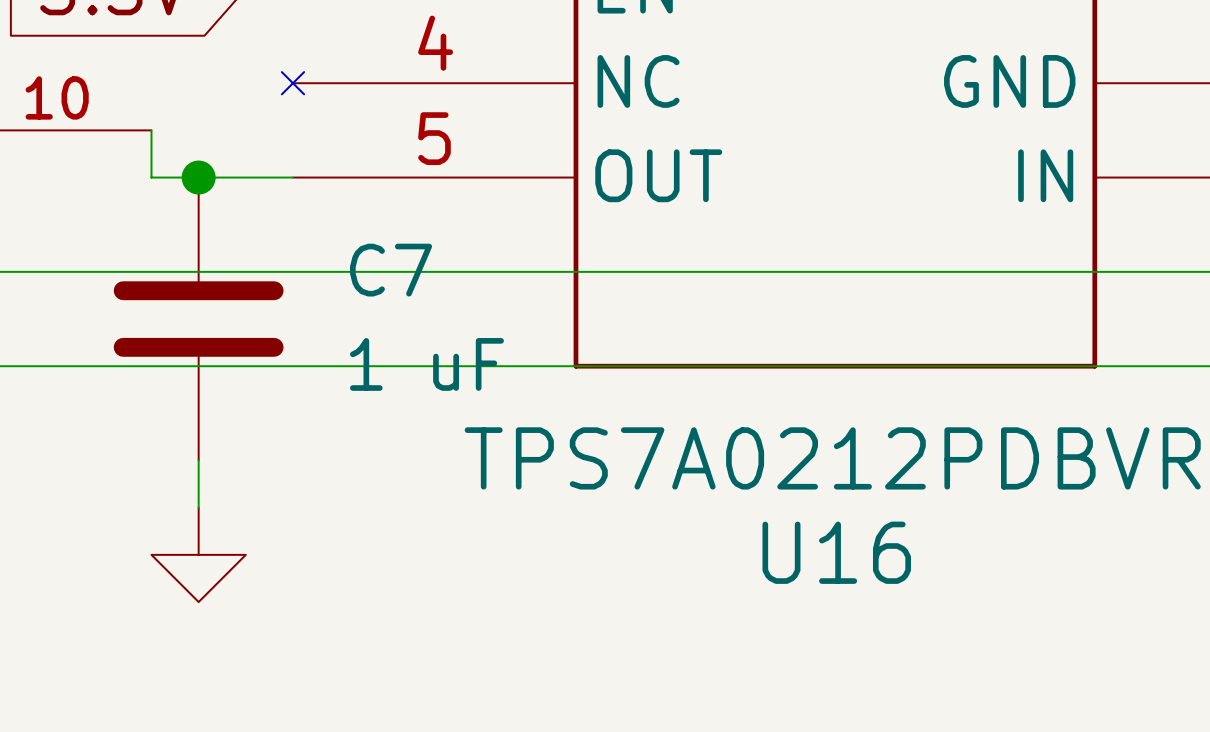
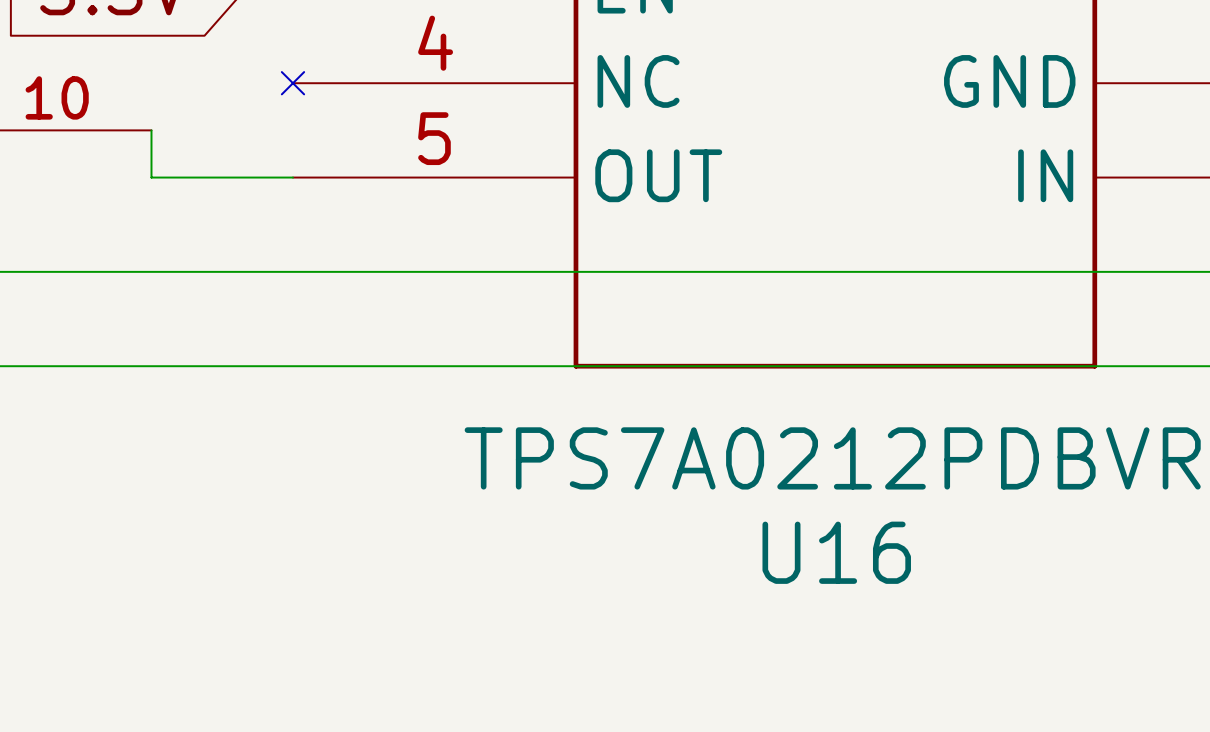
junction: (198, 177) -> none
C7: 1 uF (198, 319) -> none
wire: (198, 460) (198, 507) -> none
power symbol: (198, 554) -> none

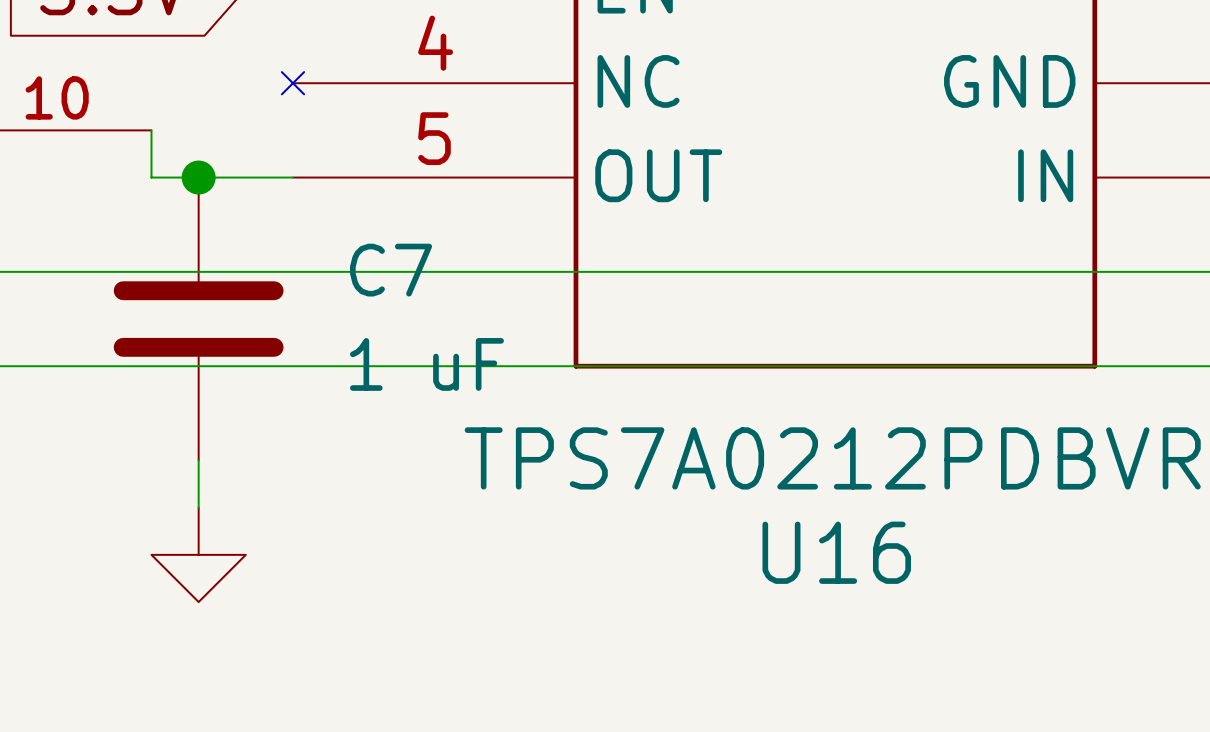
junction: none -> (198, 177)
C7: none -> 1 uF (198, 319)
wire: none -> (198, 460) (198, 507)
power symbol: none -> (198, 554)

